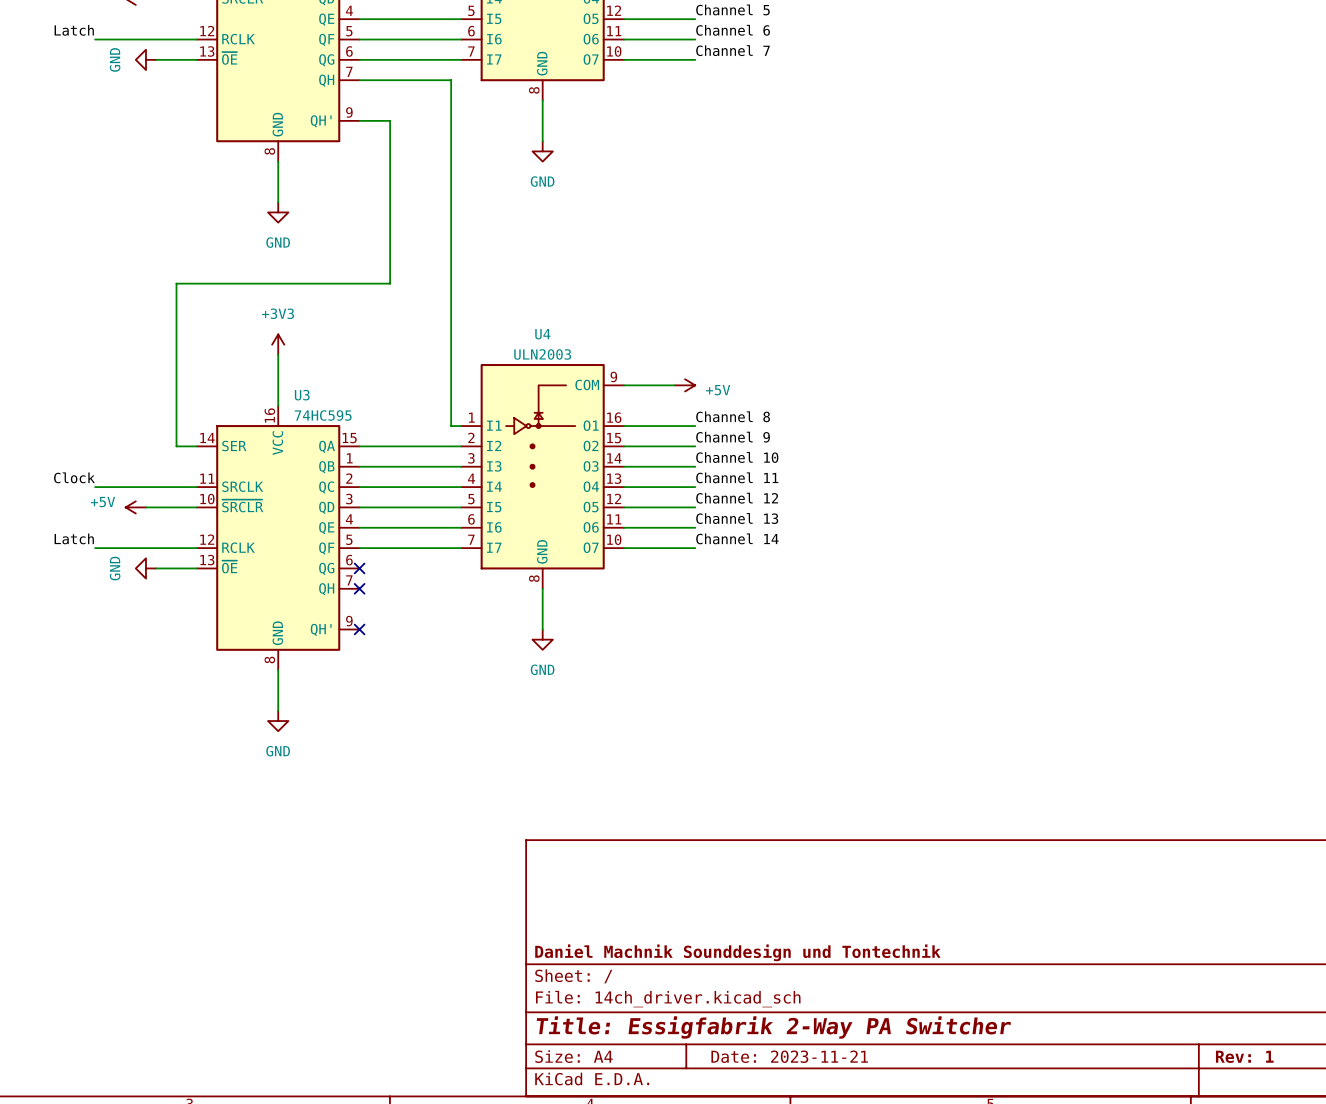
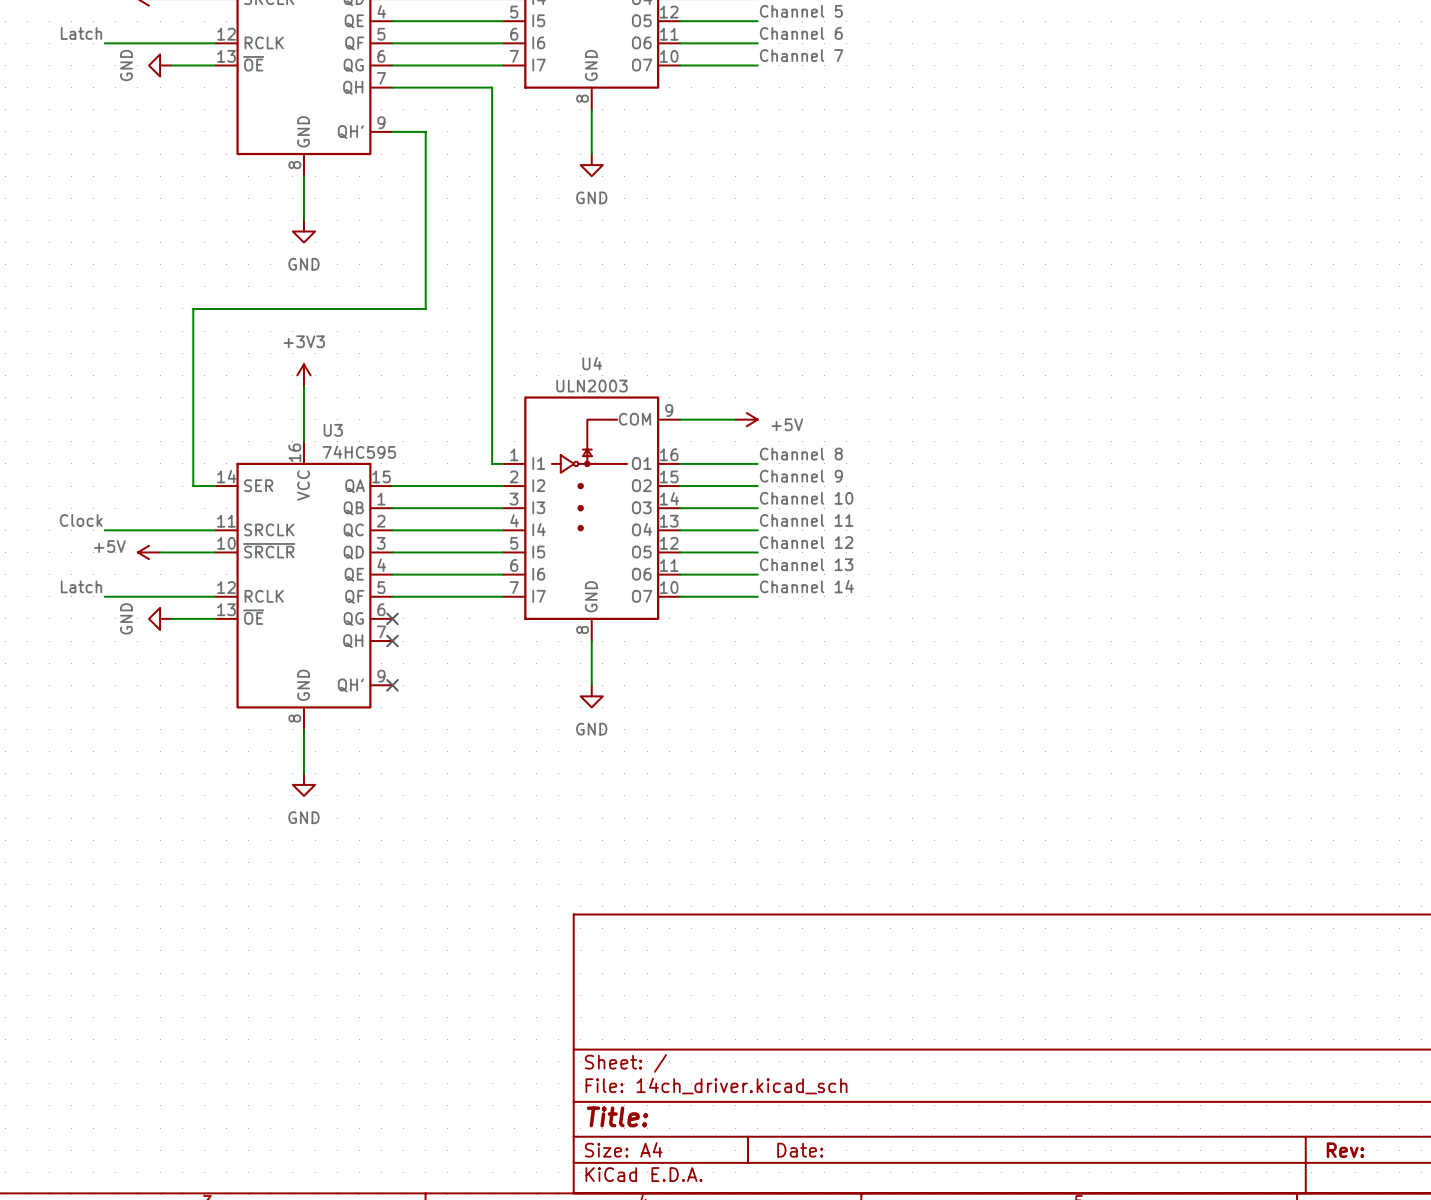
title block: Daniel Machnik Sounddesign und Tontechnik (737, 952) -> none
title block: Title: Essigfabrik 2-Way PA Switcher (773, 1027) -> Title: (617, 1116)
title block: Date: 2023-11-21 (789, 1056) -> Date: (800, 1150)
title block: Rev: 1 (1244, 1056) -> Rev: (1345, 1150)

